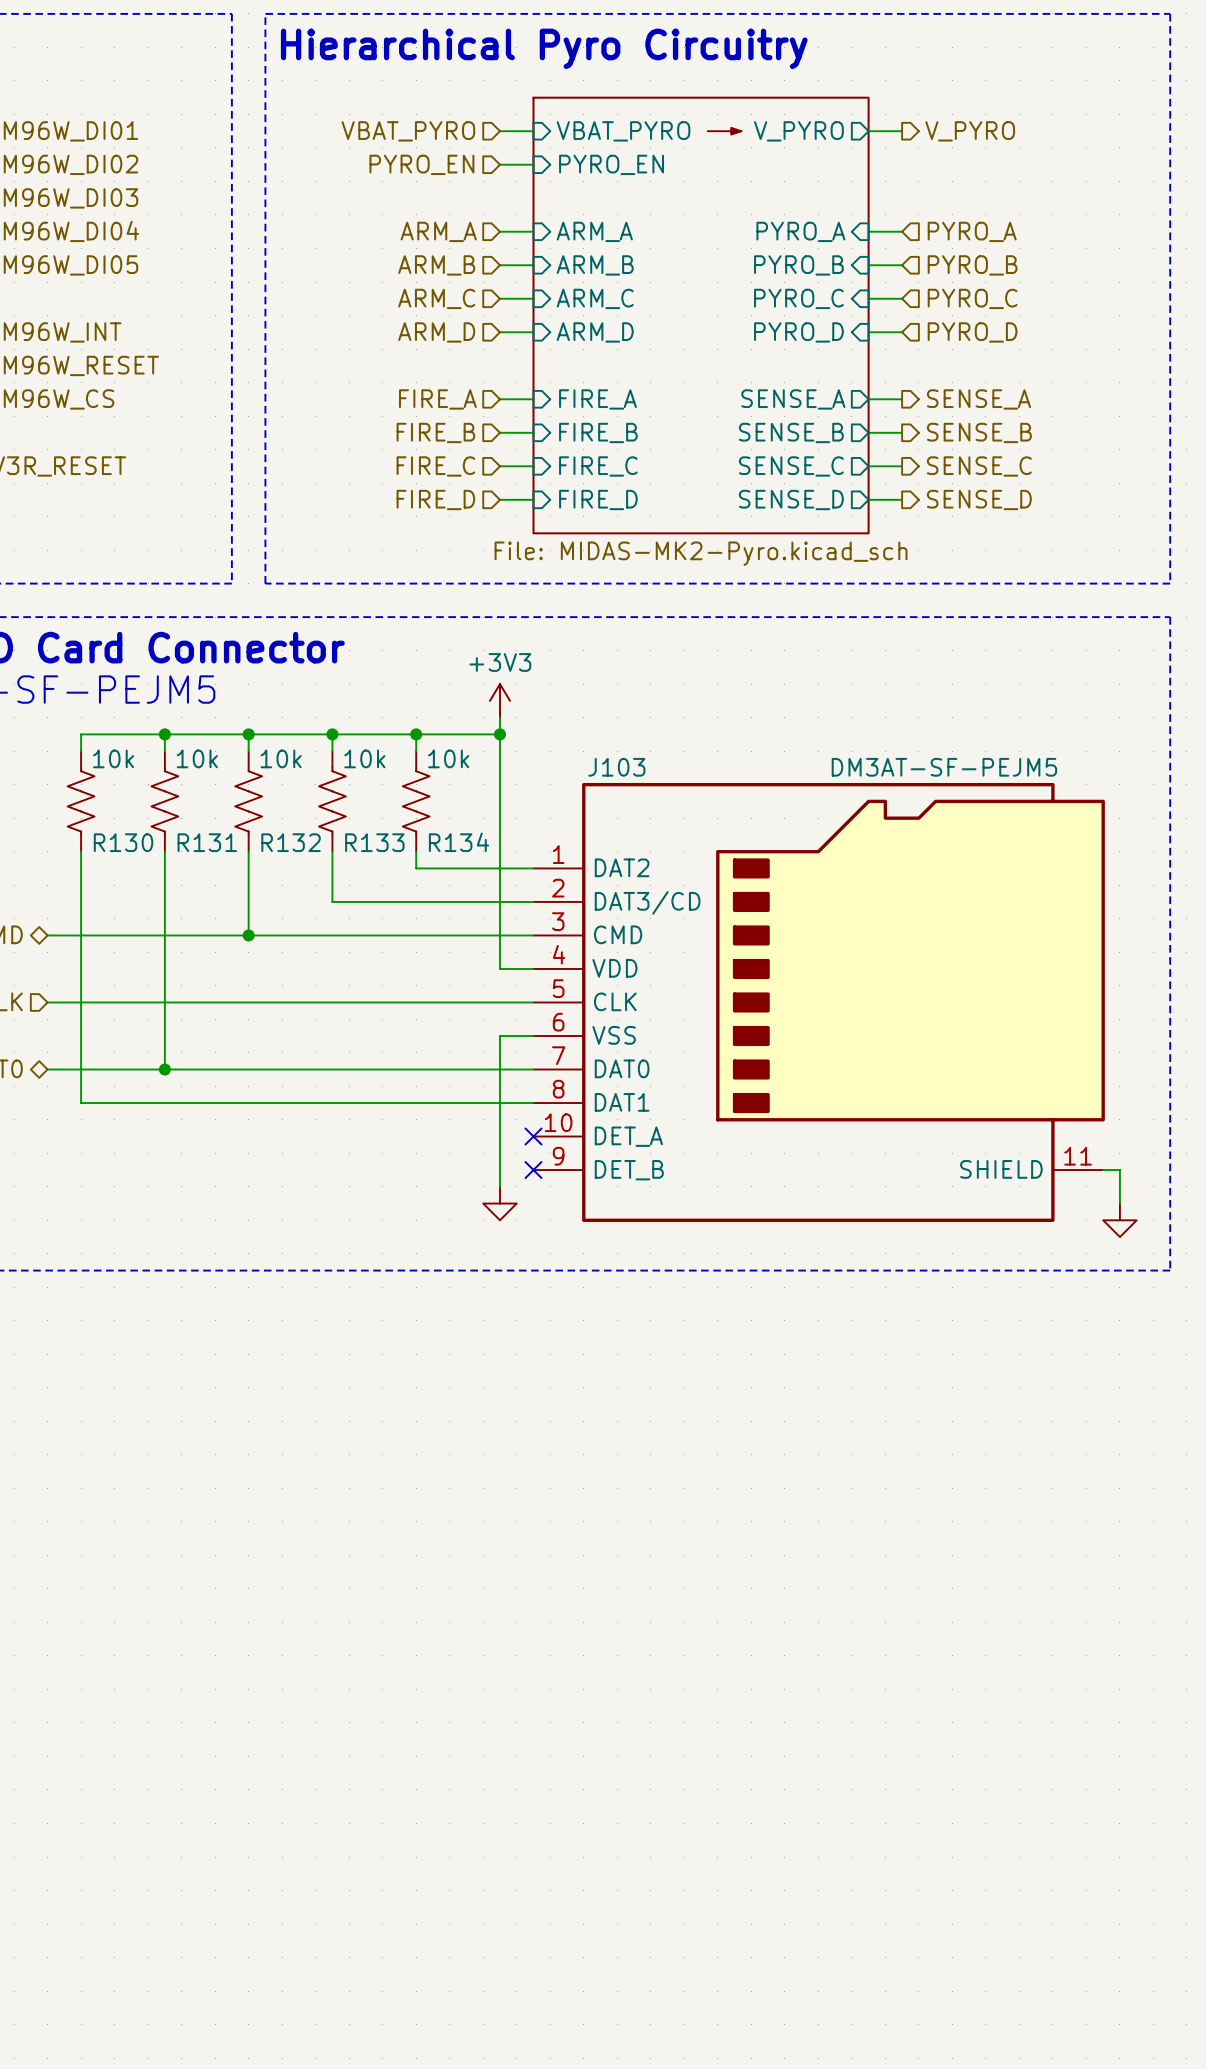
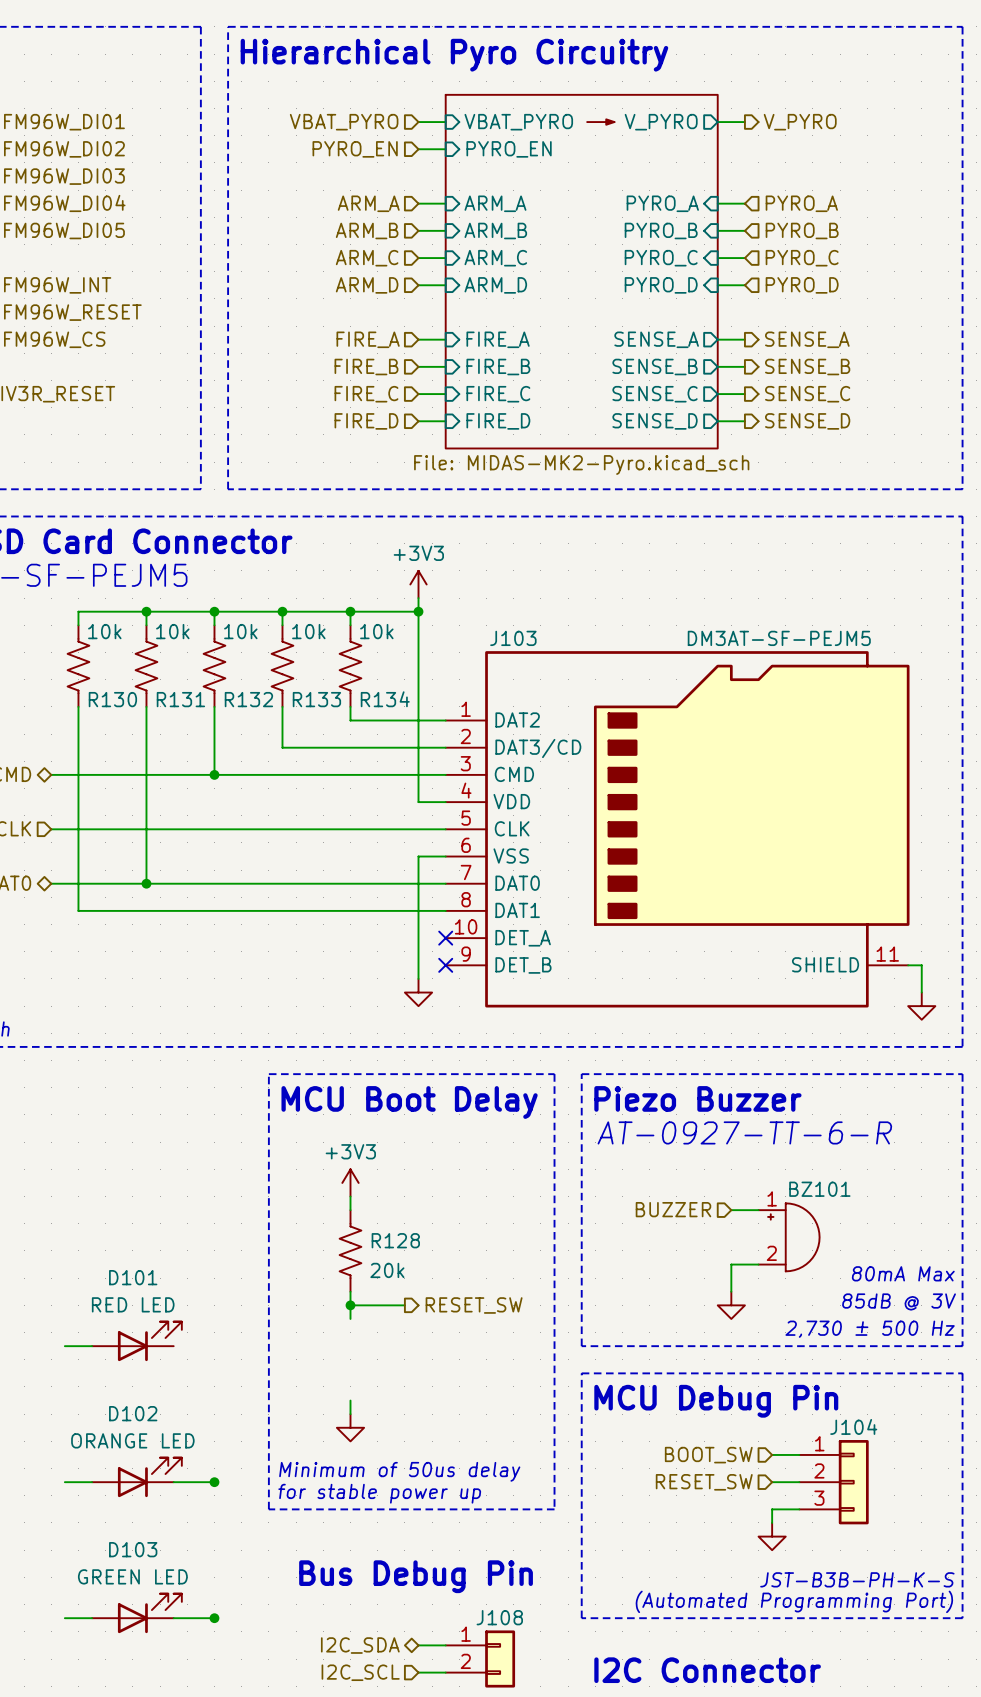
line: none -> (268, 1074) (554, 1074) (554, 1509) (268, 1509) (268, 1074)
line: none -> (581, 1074) (581, 1346) (962, 1346) (962, 1074) (581, 1074)
text: none -> Piezo Buzzer (697, 1098)
text: none -> MCU Boot Delay (409, 1102)
text: none -> AT-0927-TT-6-R (744, 1132)
power symbol: none -> +3V3 (350, 1182)
wire: none -> (350, 1196) (350, 1210)
hierarchical label: none -> BUZZER (673, 1209)
wire: none -> (731, 1210) (758, 1210)
BZ101: none -> (789, 1237)
R128: none -> 20k (350, 1250)
wire: none -> (758, 1264) (731, 1264) (731, 1291)
text: none -> 80mA Max (903, 1273)
wire: none -> (350, 1291) (350, 1318)
text: none -> 85dB @ 3V (899, 1301)
wire: none -> (350, 1305) (404, 1305)
junction: none -> (350, 1305)
power symbol: none -> (731, 1305)
hierarchical label: none -> RESET_SW (474, 1305)
text: none -> 2,730 ± 500 Hz (870, 1329)
D101: none -> RED LED (136, 1341)
wire: none -> (64, 1346) (92, 1346)
line: none -> (581, 1373) (962, 1373) (962, 1618) (581, 1618) (581, 1373)
wire: none -> (350, 1400) (350, 1414)
text: none -> MCU Debug Pin (716, 1401)
power symbol: none -> (350, 1427)
hierarchical label: none -> BOOT_SW (708, 1455)
wire: none -> (772, 1454) (799, 1454)
text: none -> Minimum of 50us delay (399, 1471)
D102: none -> ORANGE LED (136, 1477)
wire: none -> (64, 1482) (92, 1482)
wire: none -> (173, 1482) (214, 1482)
junction: none -> (214, 1482)
hierarchical label: none -> RESET_SW (704, 1482)
wire: none -> (772, 1482) (799, 1482)
J104: none -> (834, 1482)
text: none -> for stable power up (379, 1493)
wire: none -> (799, 1509) (772, 1509) (772, 1522)
power symbol: none -> (772, 1536)
text: none -> Bus Debug Pin (416, 1576)
text: none -> JST-B3B-PH-K-S (857, 1579)
text: none -> (Automated Programming Port) (794, 1601)
D103: none -> GREEN LED (136, 1613)
wire: none -> (64, 1618) (92, 1618)
wire: none -> (173, 1618) (214, 1618)
junction: none -> (214, 1618)
hierarchical label: none -> I2C_SDA (360, 1645)
wire: none -> (418, 1645) (445, 1645)
J108: none -> (480, 1659)
text: none -> I2C Connector (707, 1670)
hierarchical label: none -> I2C_SCL (360, 1672)
wire: none -> (418, 1672) (445, 1672)

